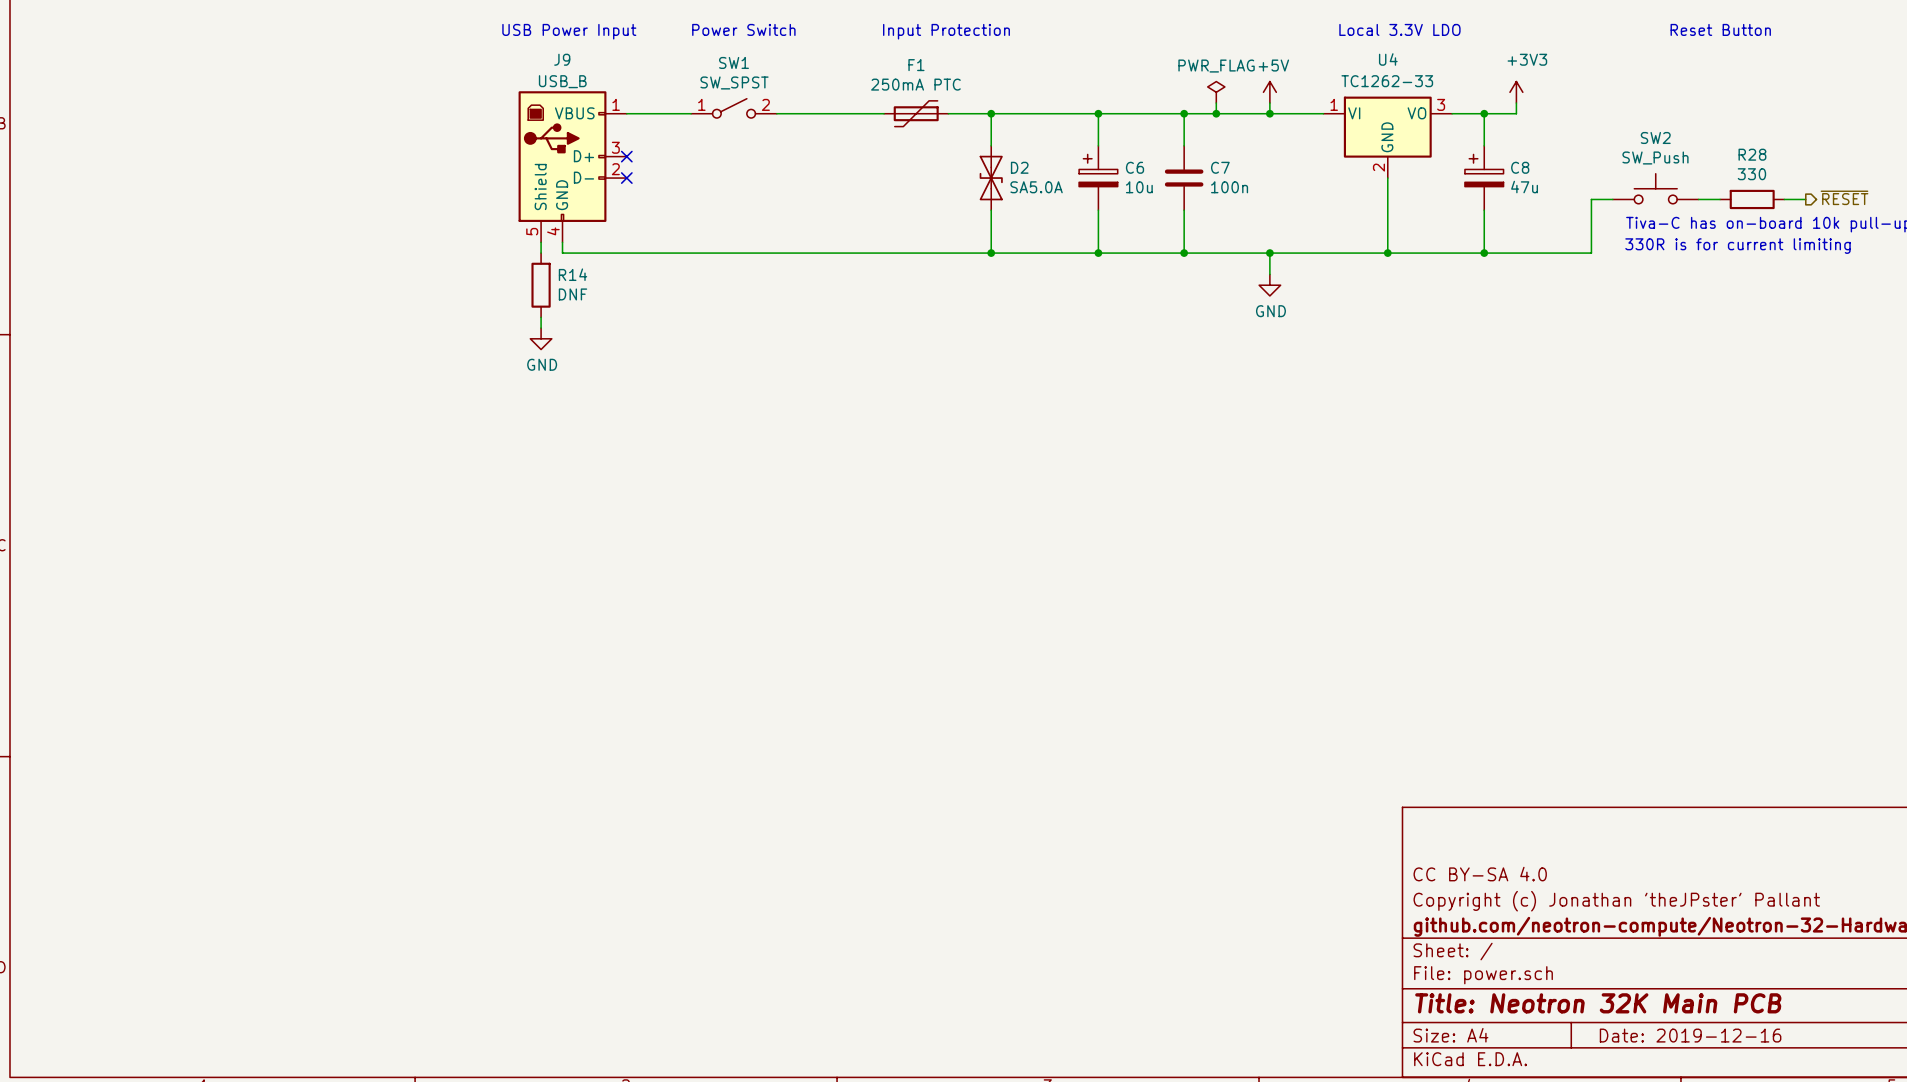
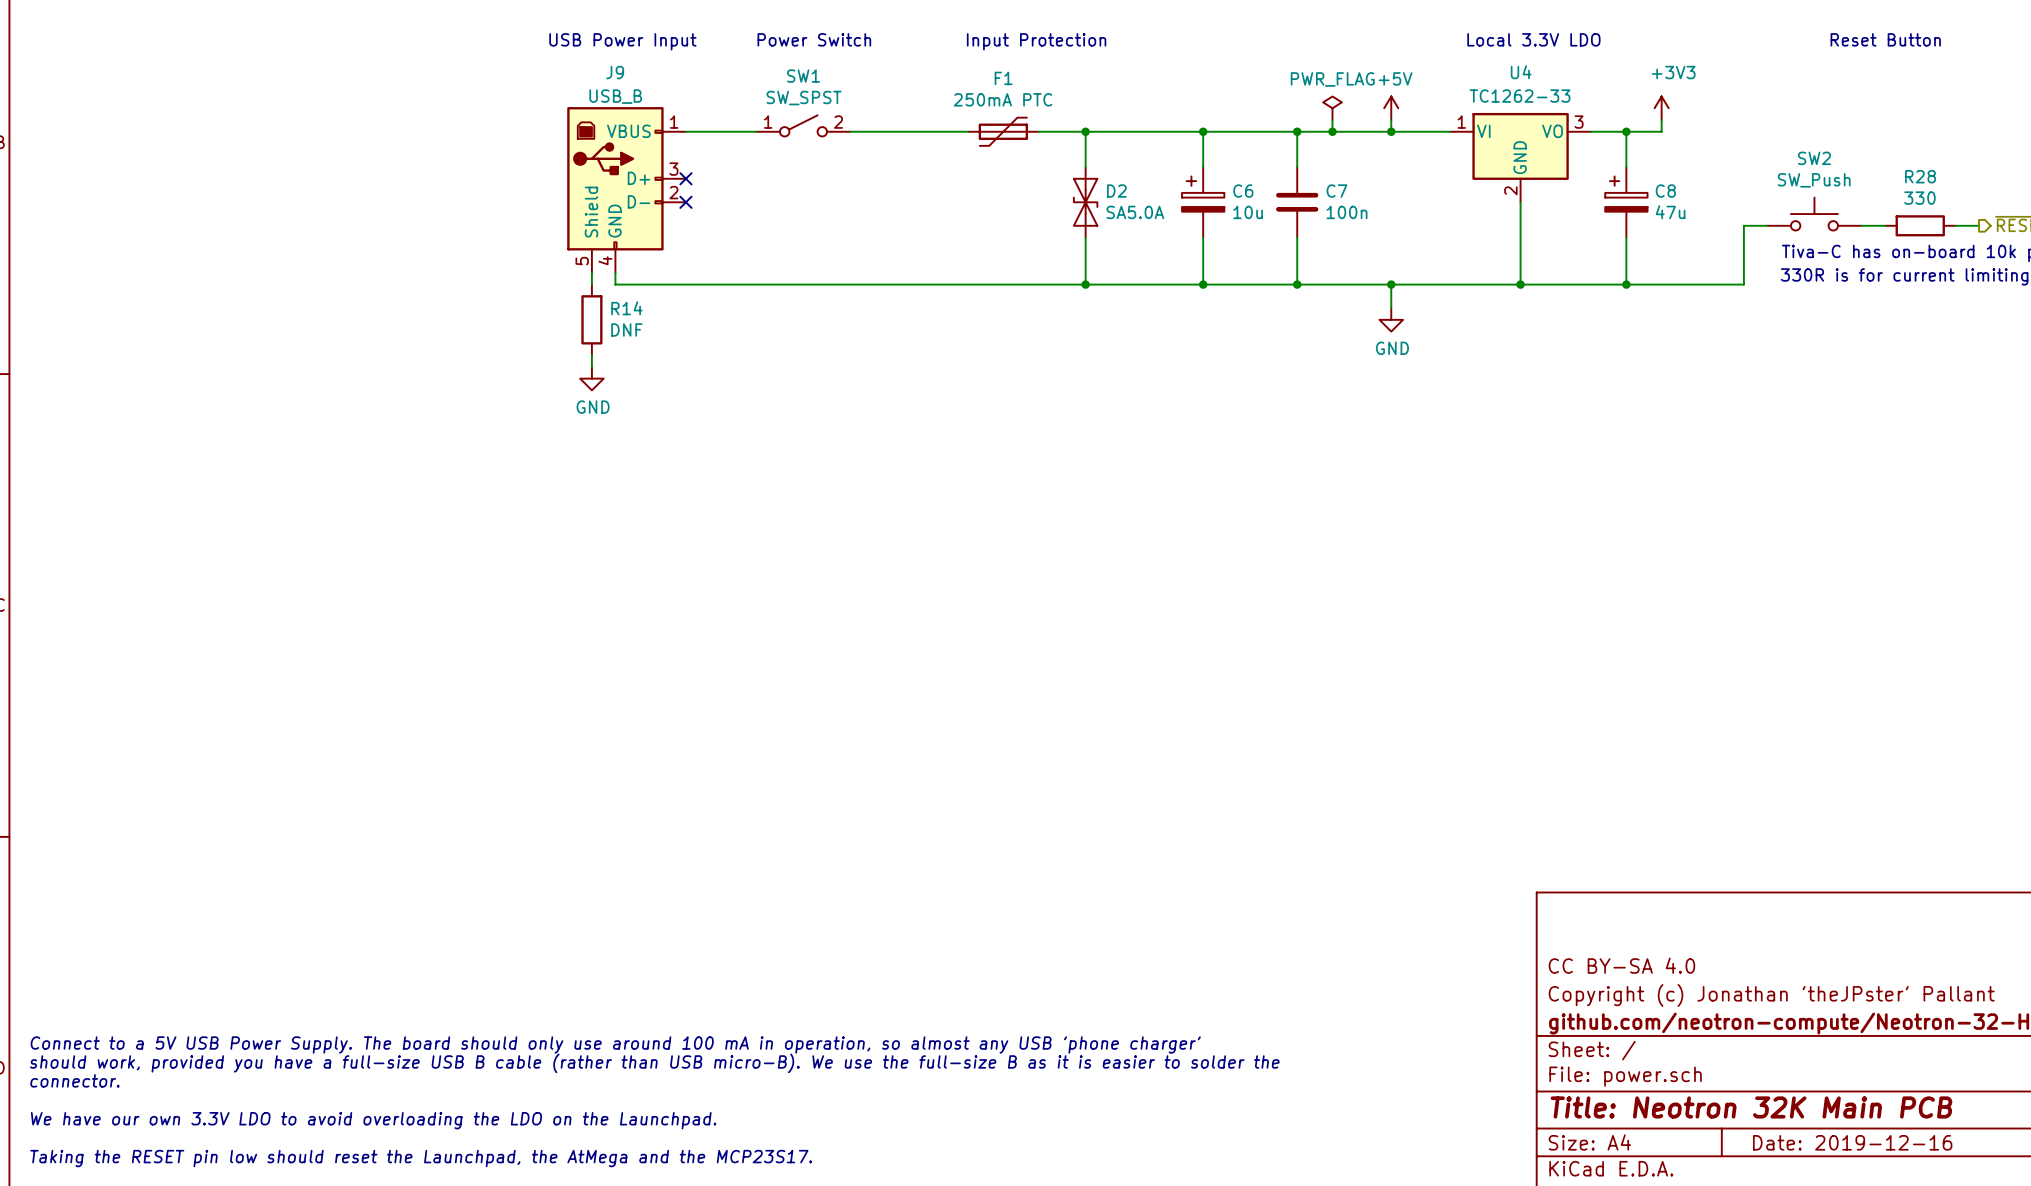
text: none -> Connect to a 5V USB Power Supply. The board should only use around 100 mA in operation, so almost any USB 'phone charger' (615, 1044)
text: none -> should work, provided you have a full-size USB B cable (rather than USB micro-B). We use the full-size B as it is easier to solder the (654, 1063)
text: none -> connector. (74, 1080)
text: none -> We have our own 3.3V LDO to avoid overloading the LDO on the Launchpad. (373, 1120)
text: none -> Taking the RESET pin low should reset the Launchpad, the AtMega and the MCP23S17. (421, 1158)

